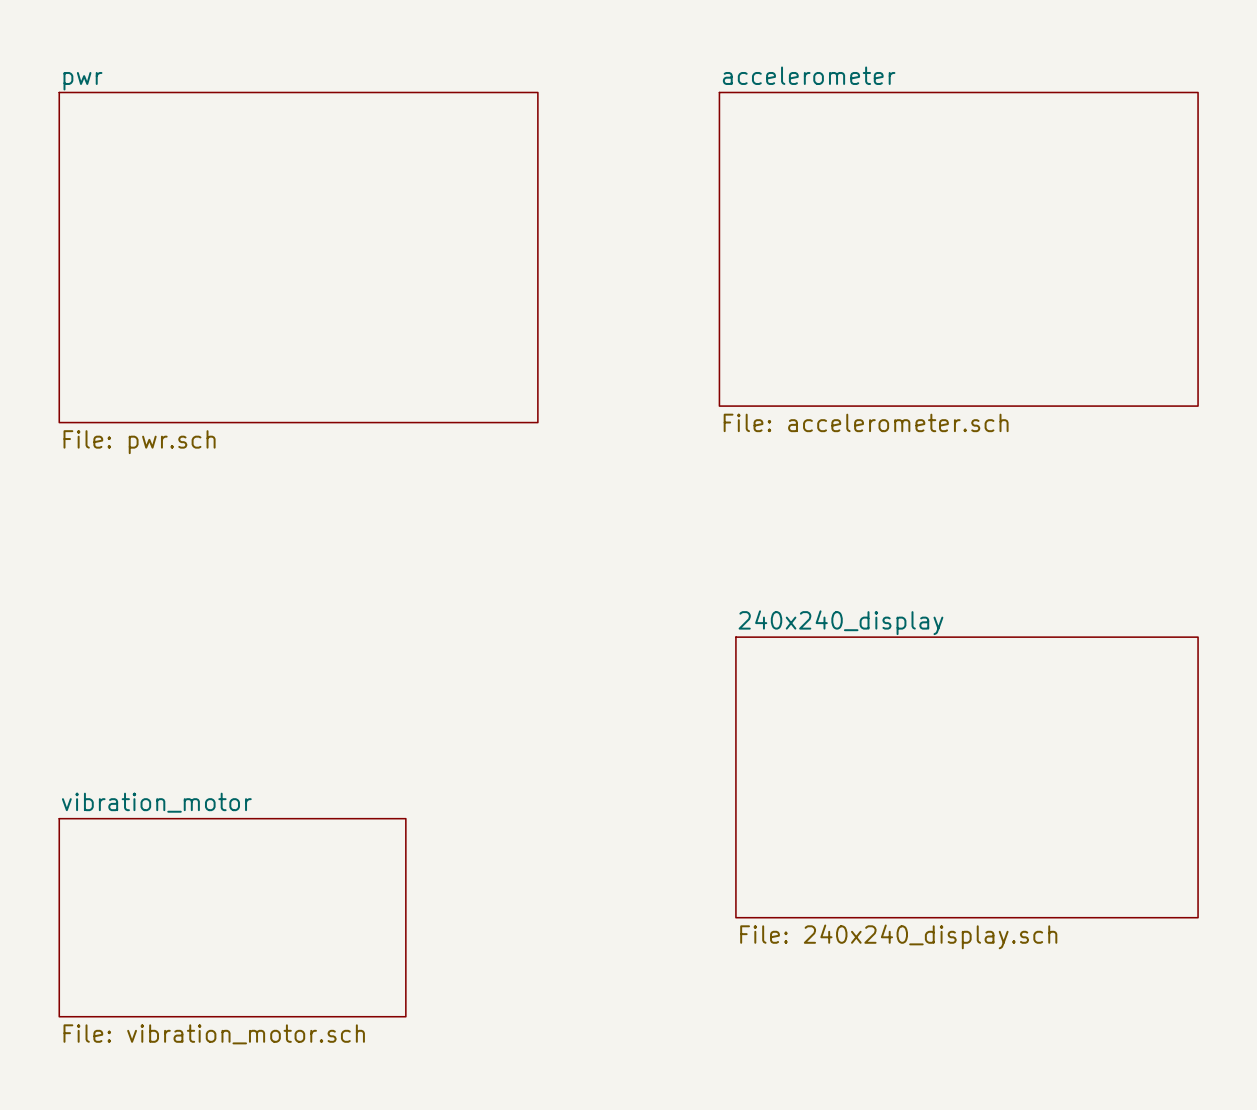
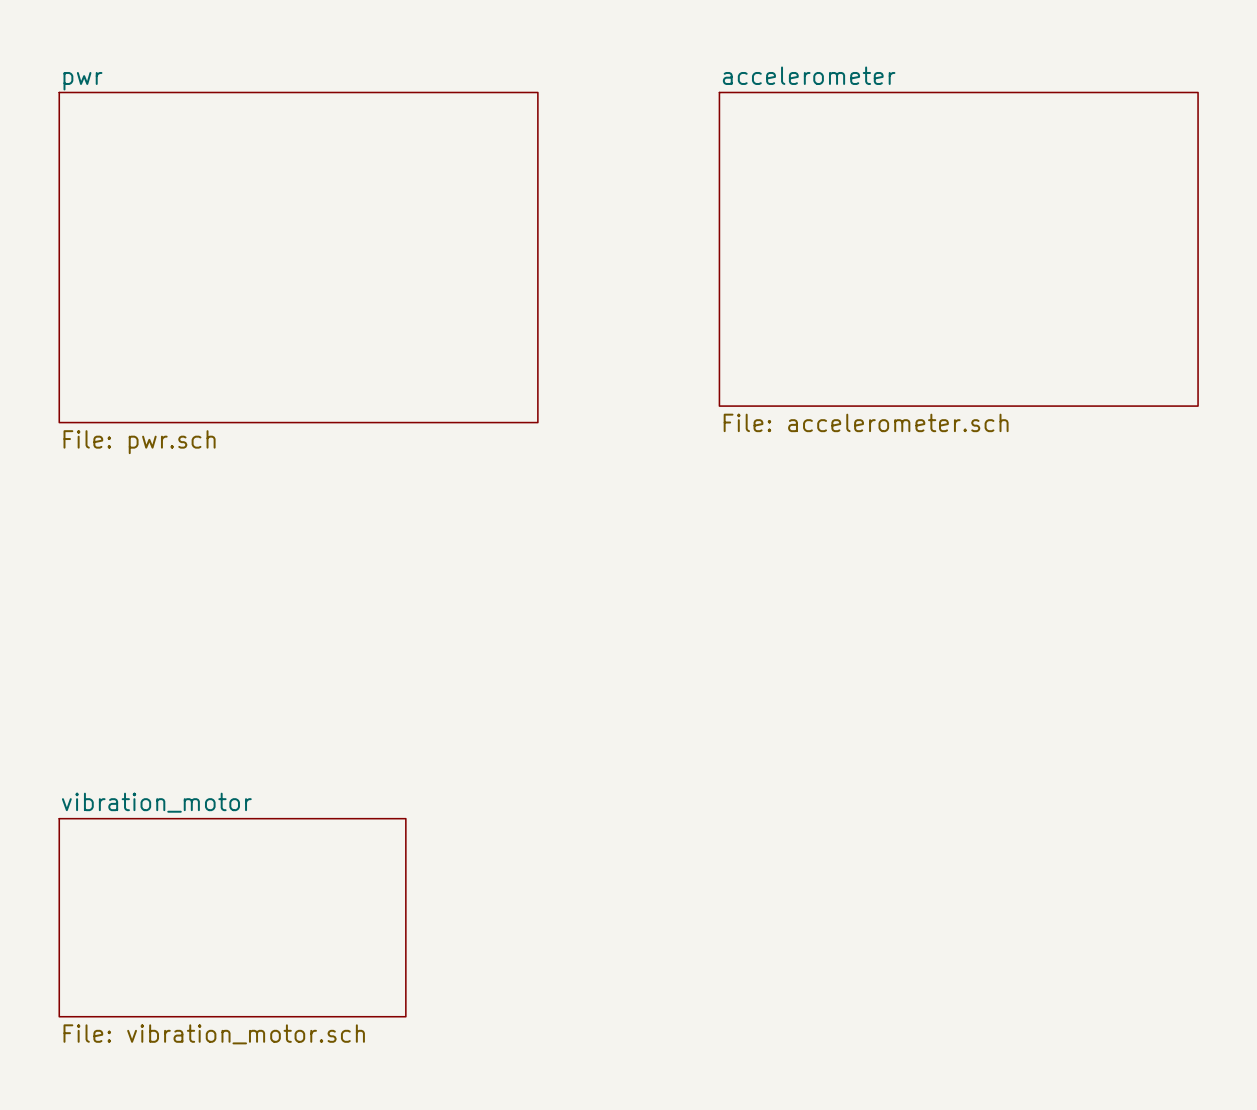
sheet 240x240_display: File: 240x240_display.sch (966, 777) -> none

